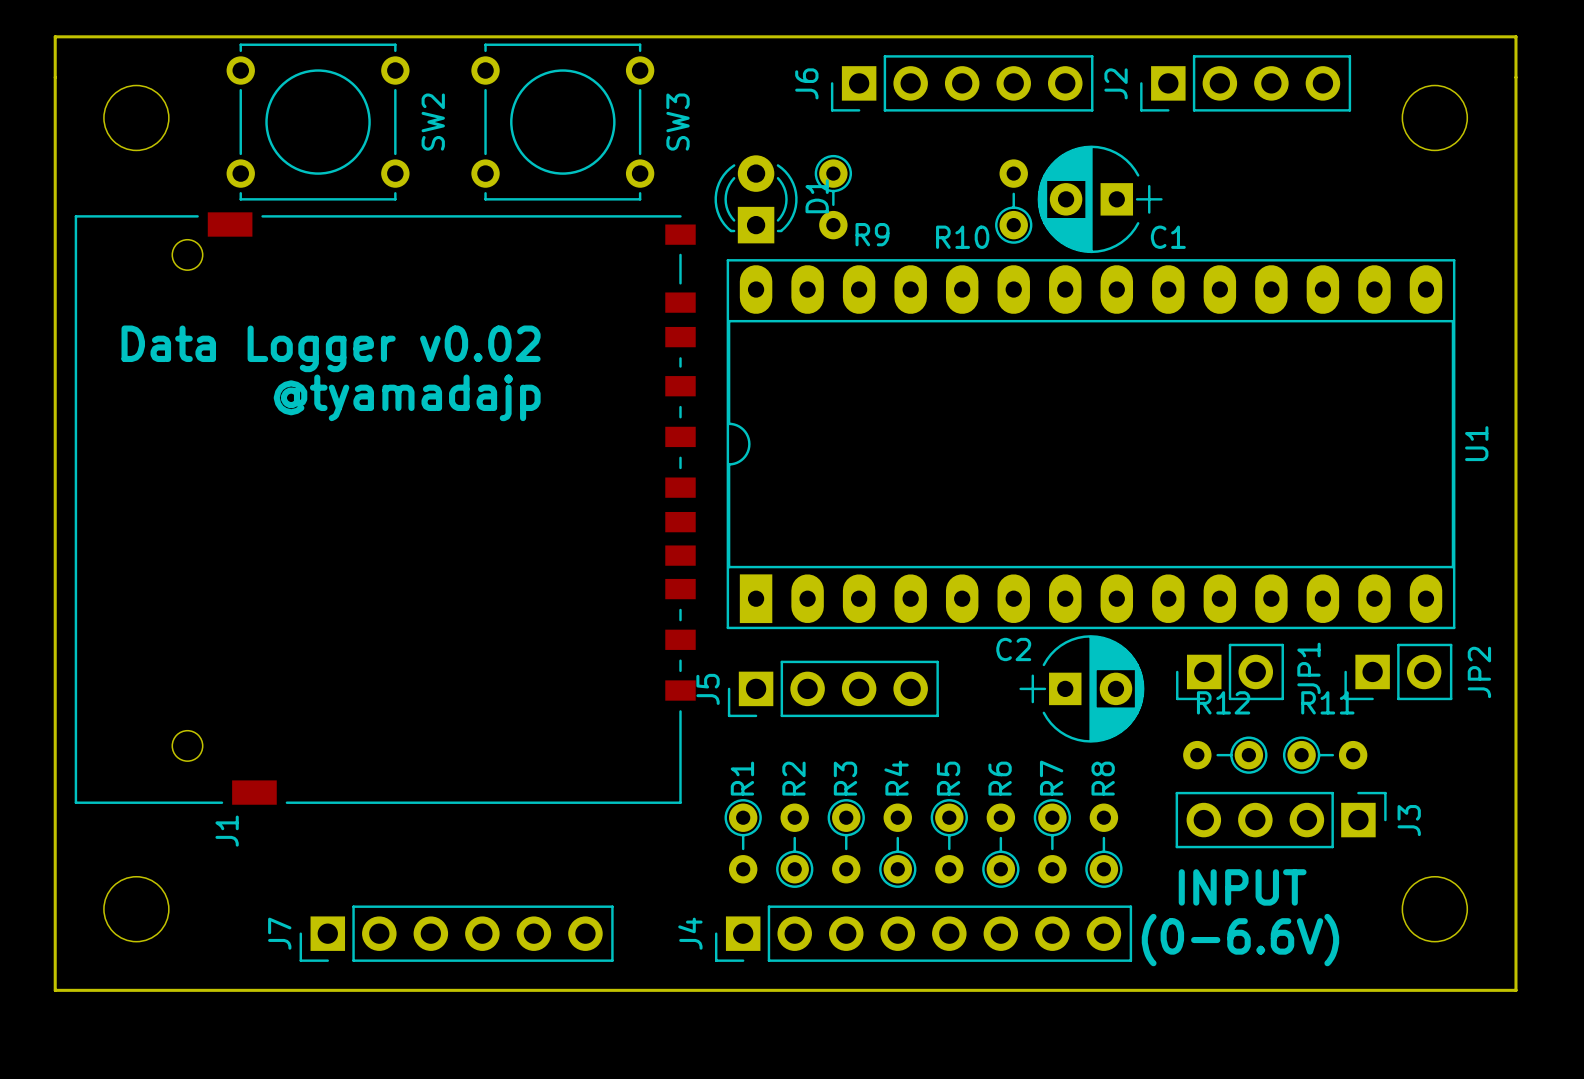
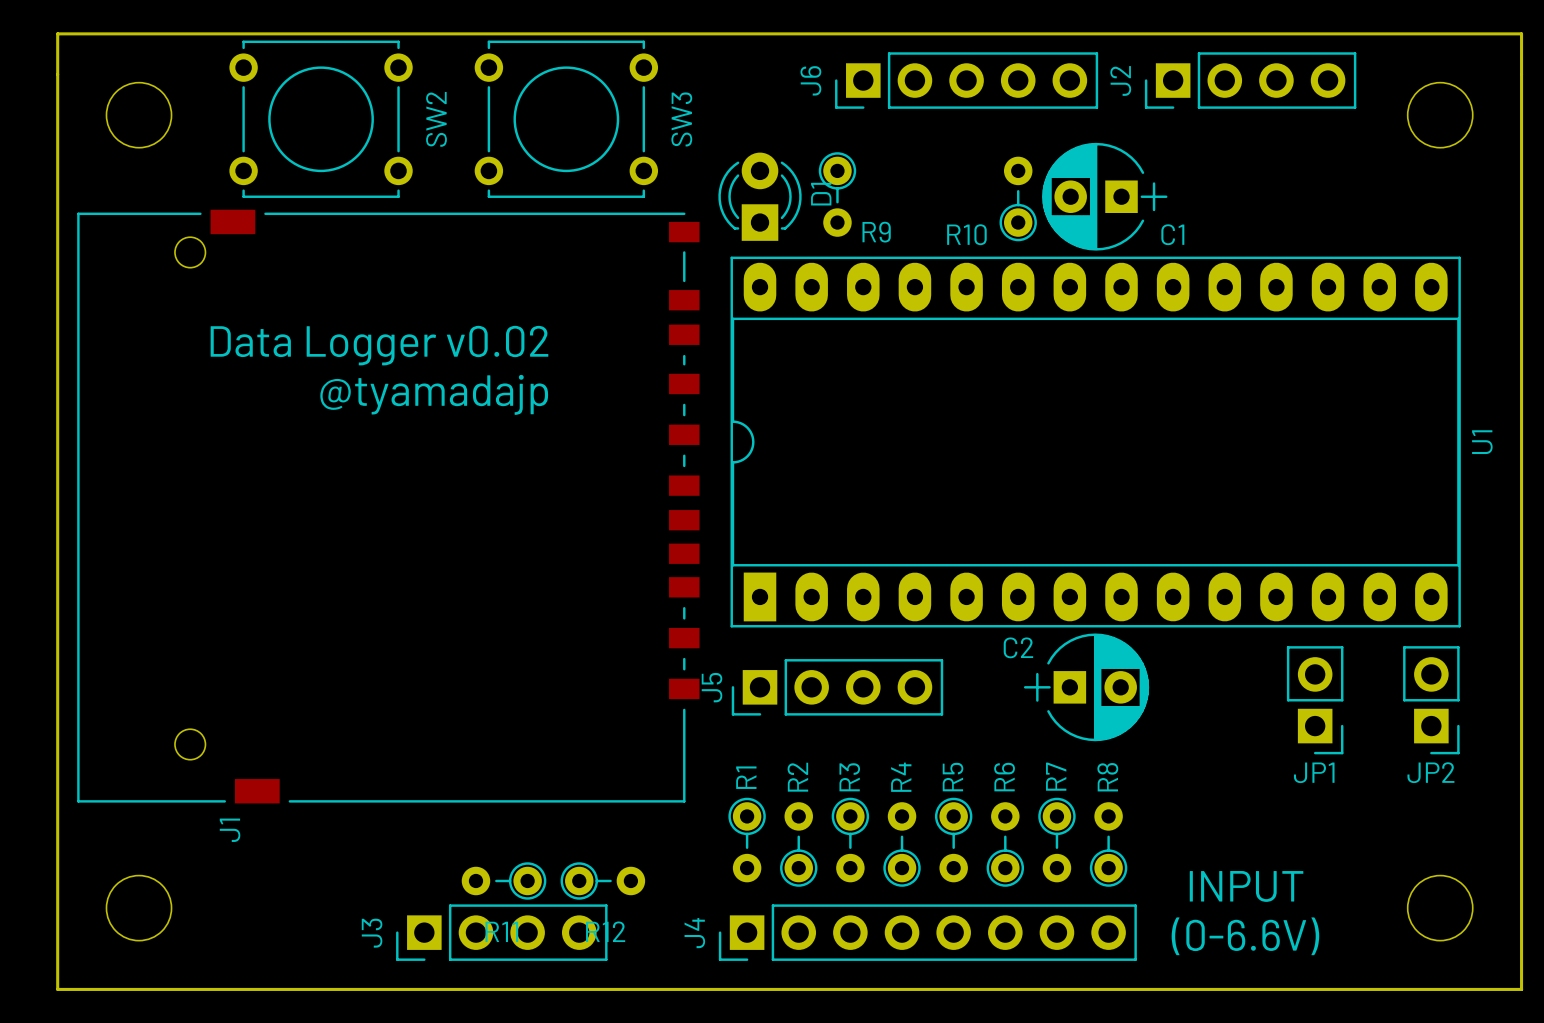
JP1 name position: JP1 (1308, 668) -> JP1 (1314, 772)
JP1 rotation: 0° (1230, 671) -> 90° counterclockwise (1315, 700)
JP1 position: (1230, 671) -> (1315, 700)
JP2 rotation: 0° (1398, 671) -> 90° counterclockwise (1431, 700)
JP2 name position: JP2 (1479, 672) -> JP2 (1430, 772)
R12 rotation: 0° (1225, 755) -> 180° (602, 880)
R12 position: (1225, 755) -> (602, 880)
R11 rotation: 0° (1325, 755) -> 180° (504, 880)
R11 position: (1325, 755) -> (504, 880)
J3 rotation: 0° (1281, 820) -> 180° (501, 932)
J3 position: (1281, 820) -> (501, 932)
J7: (456, 933) -> none

